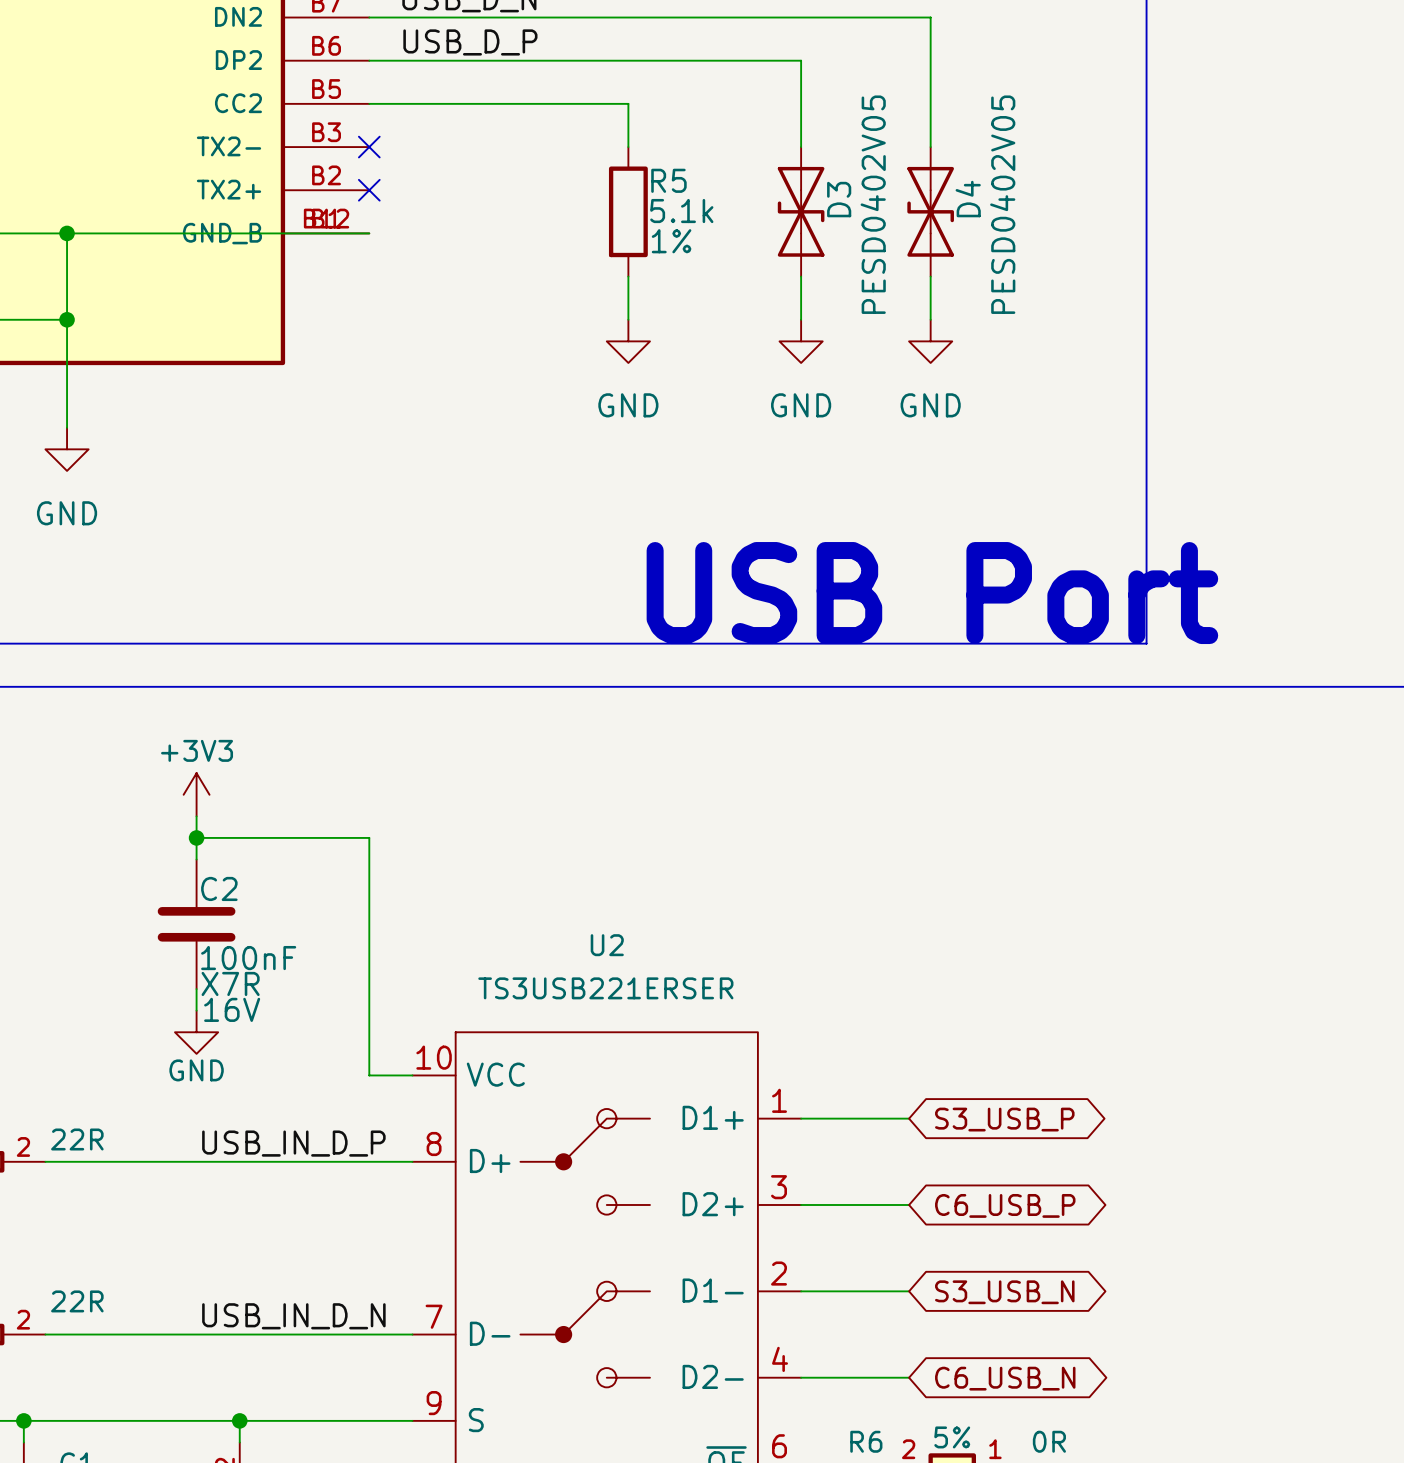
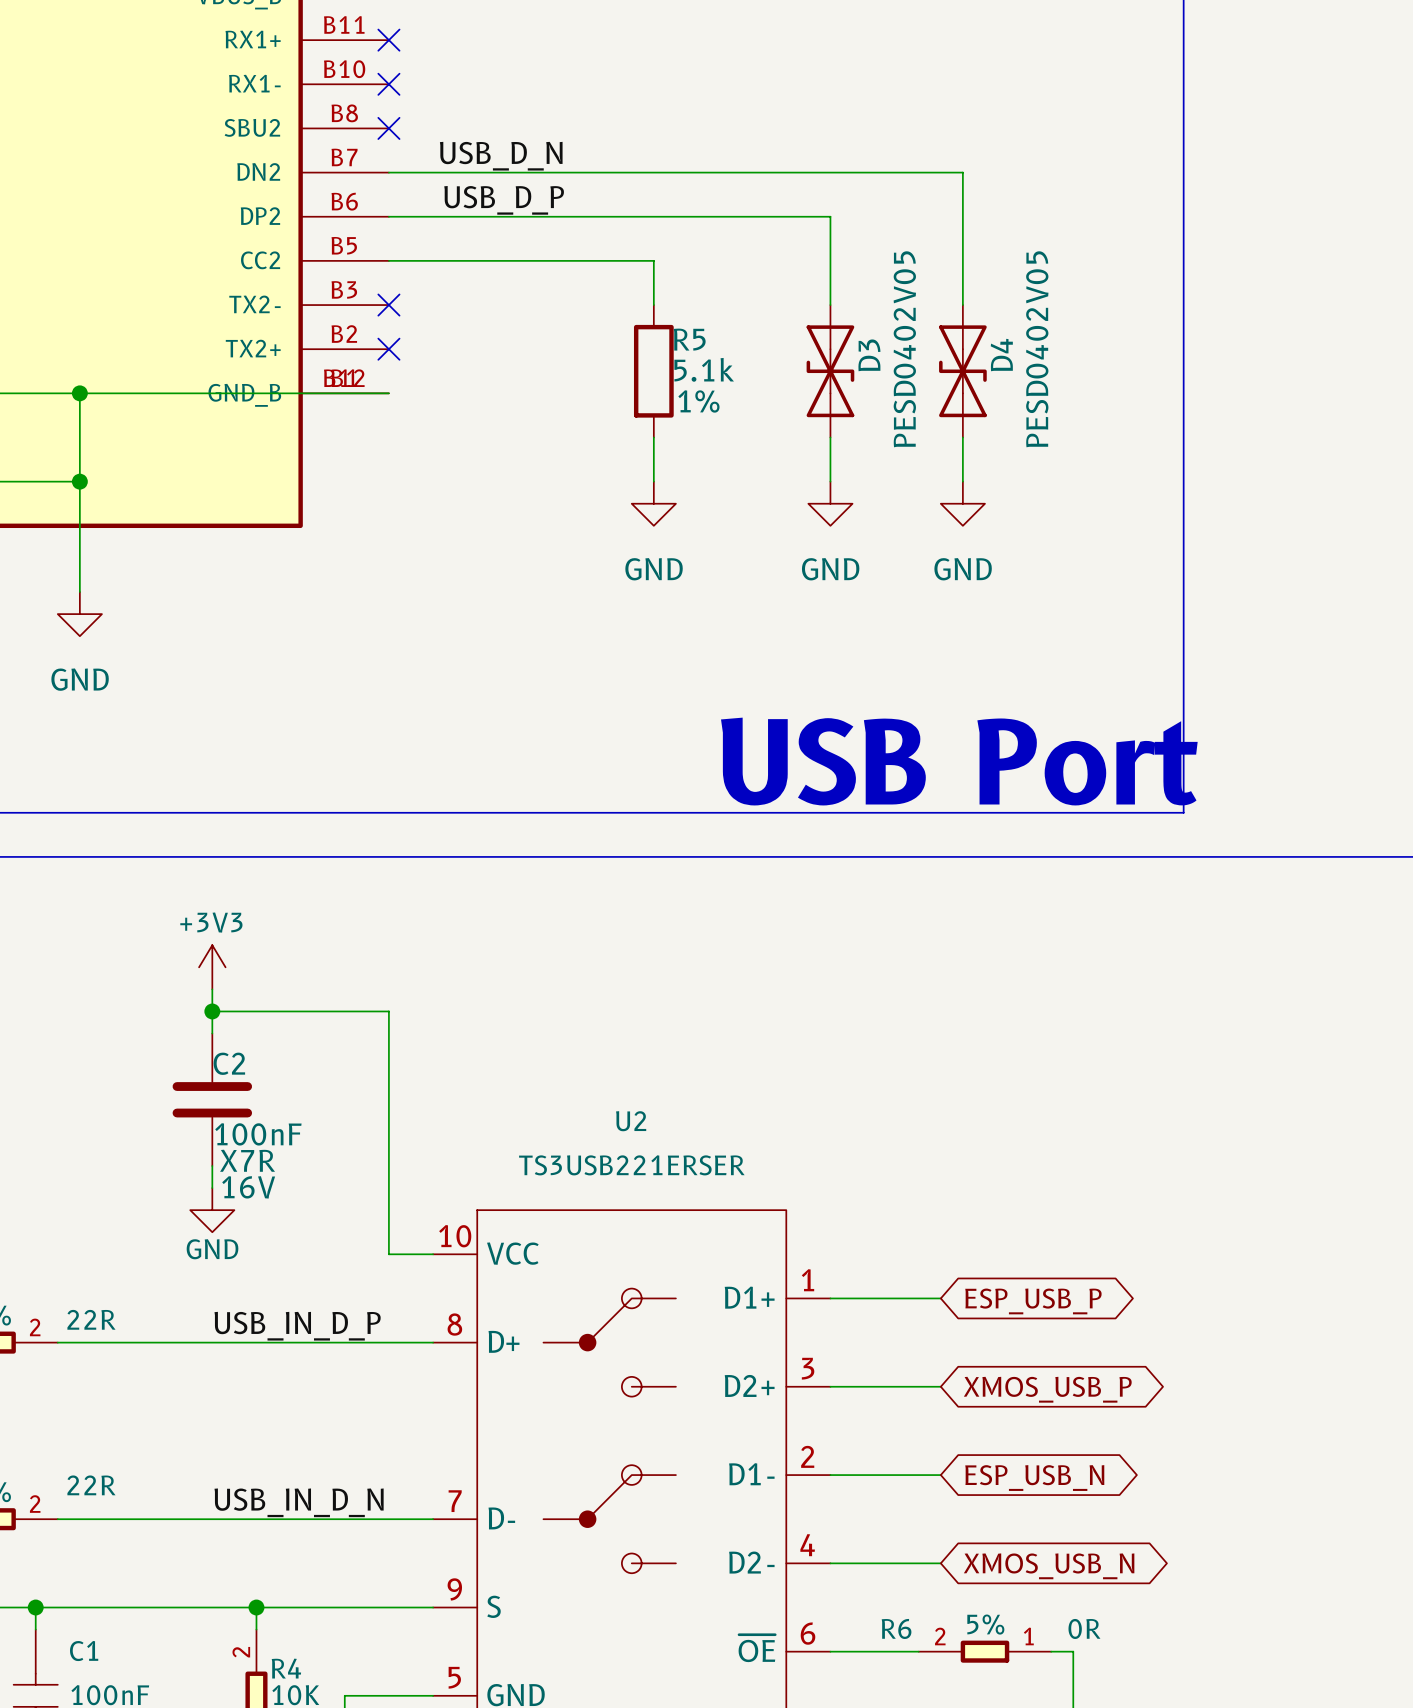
global label: S3_USB_P (1004, 1119) -> ESP_USB_P (1033, 1301)
global label: C6_USB_P (1005, 1205) -> XMOS_USB_P (1047, 1389)
global label: S3_USB_N (1004, 1292) -> ESP_USB_N (1034, 1478)
global label: C6_USB_N (1005, 1378) -> XMOS_USB_N (1049, 1566)

